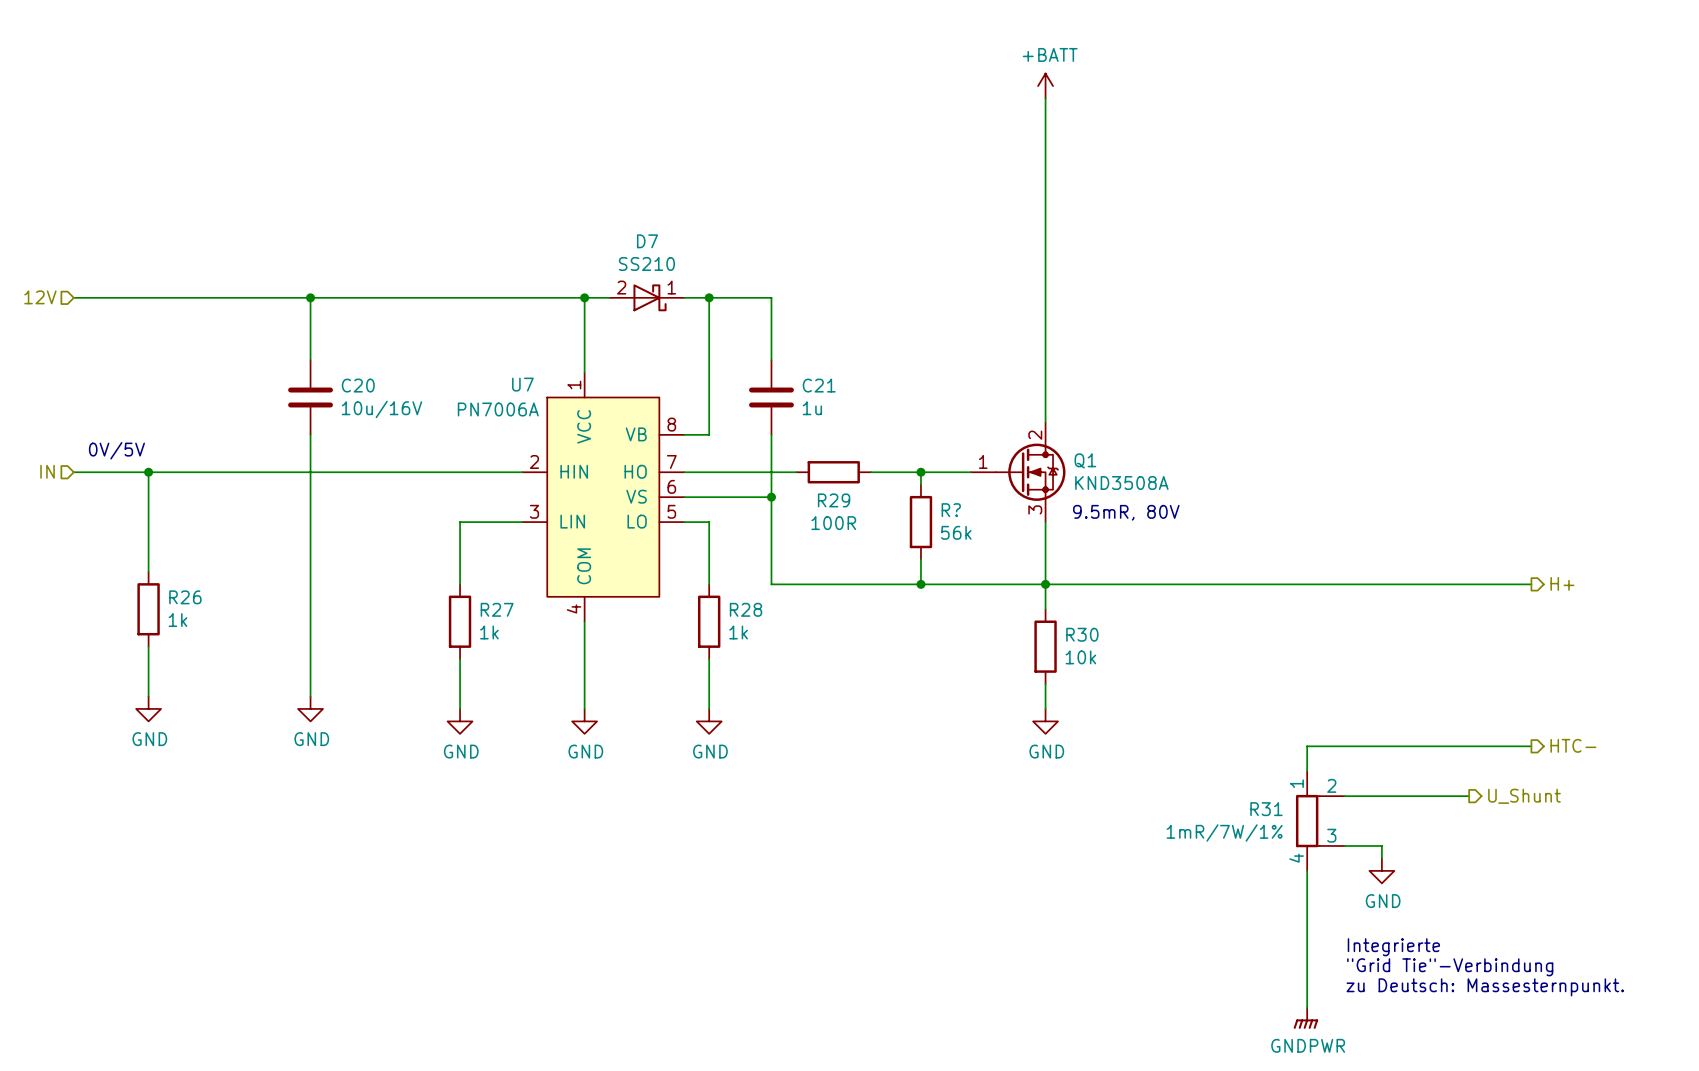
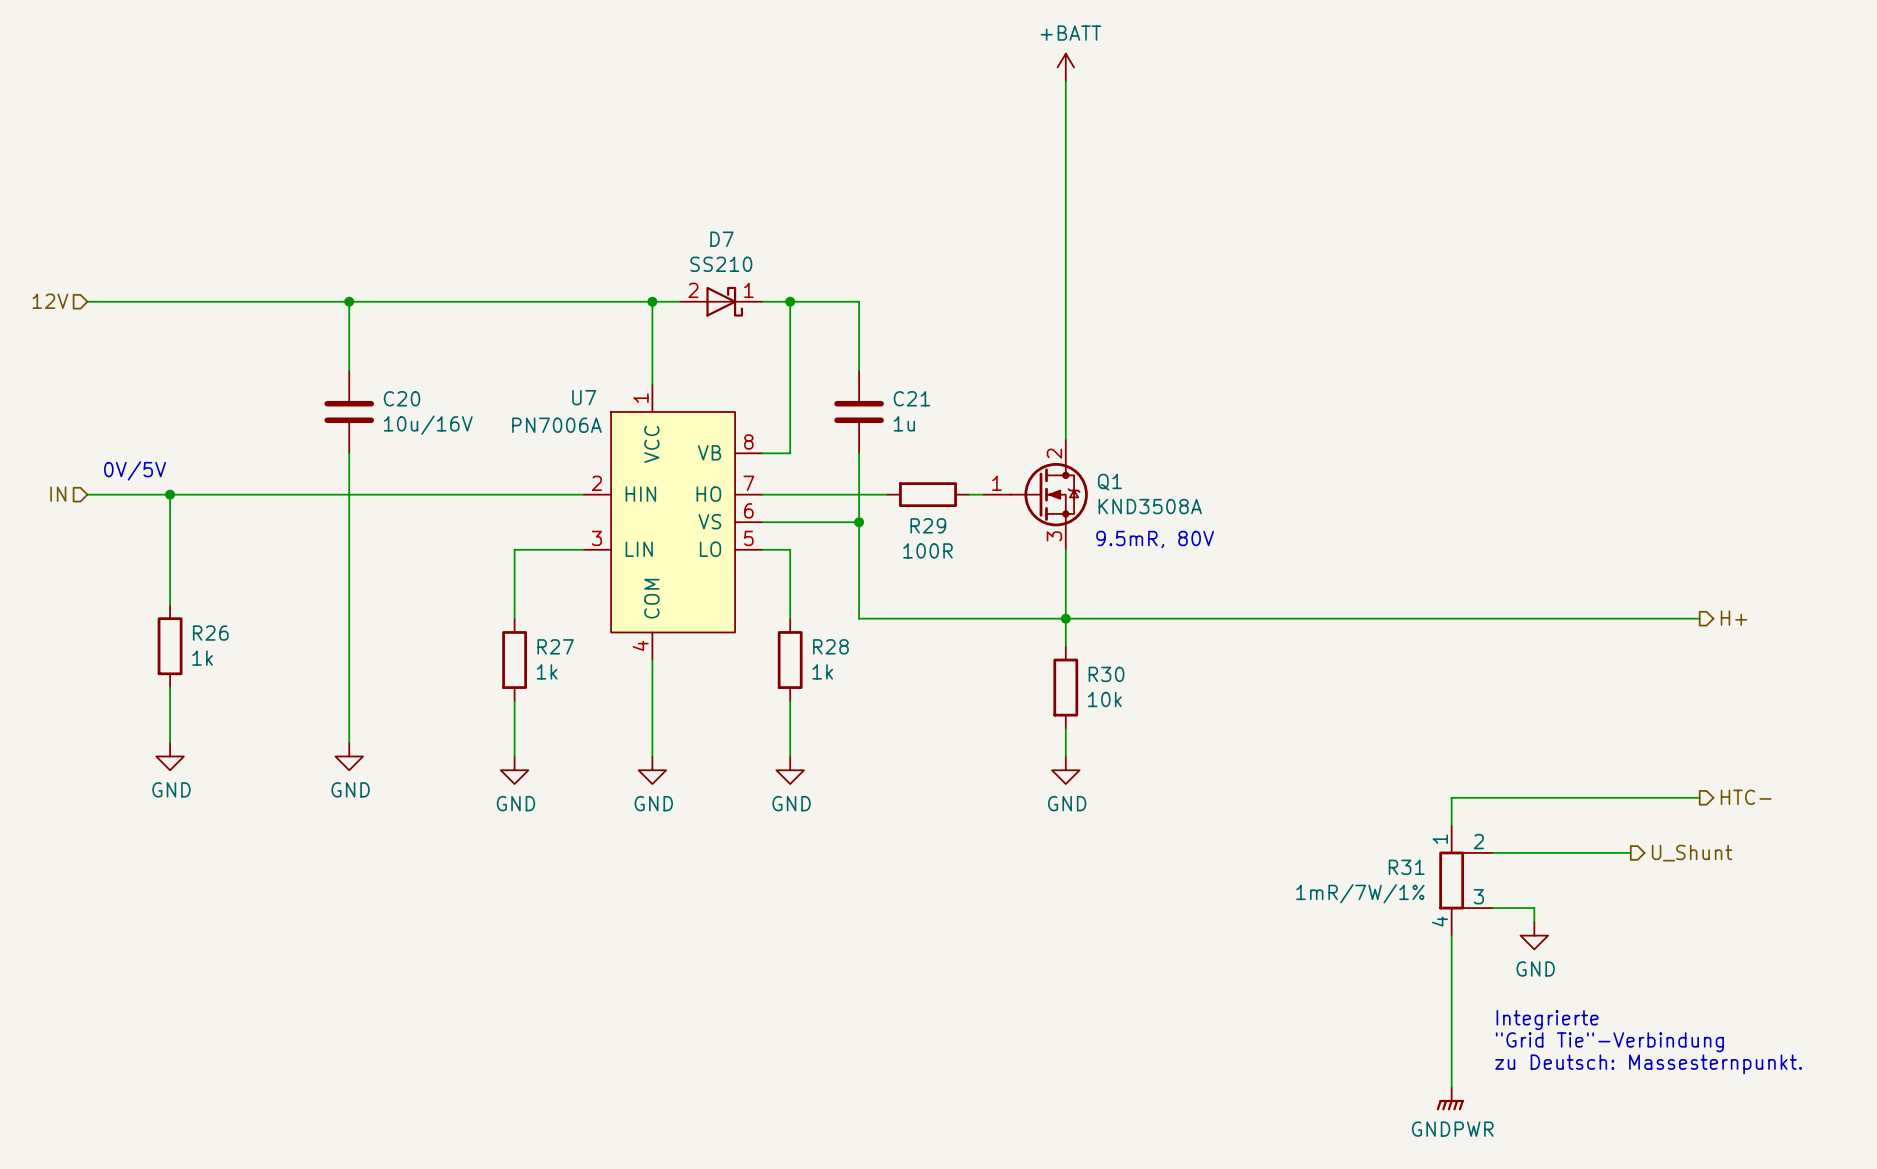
power symbol position: +BATT (1045, 86) -> +BATT (1065, 67)
wire: (1045, 98) (1045, 422) -> (1065, 81) (1065, 439)
wire: (920, 472) (920, 484) -> none
junction: (920, 472) -> none
Q1 position: (1018, 472) -> (1035, 494)
text position: 9.5mR, 80V (1126, 512) -> 9.5mR, 80V (1155, 539)
R?: 56k (920, 522) -> none
wire: (1045, 522) (1045, 609) -> (1065, 549) (1065, 646)
wire: (920, 559) (920, 584) -> none
junction position: (920, 584) -> (1065, 618)
junction: (1045, 584) -> none
R30 position: (1045, 646) -> (1065, 687)
wire: (1045, 684) (1045, 708) -> (1065, 728) (1065, 756)
power symbol position: GND (1045, 721) -> GND (1065, 770)

